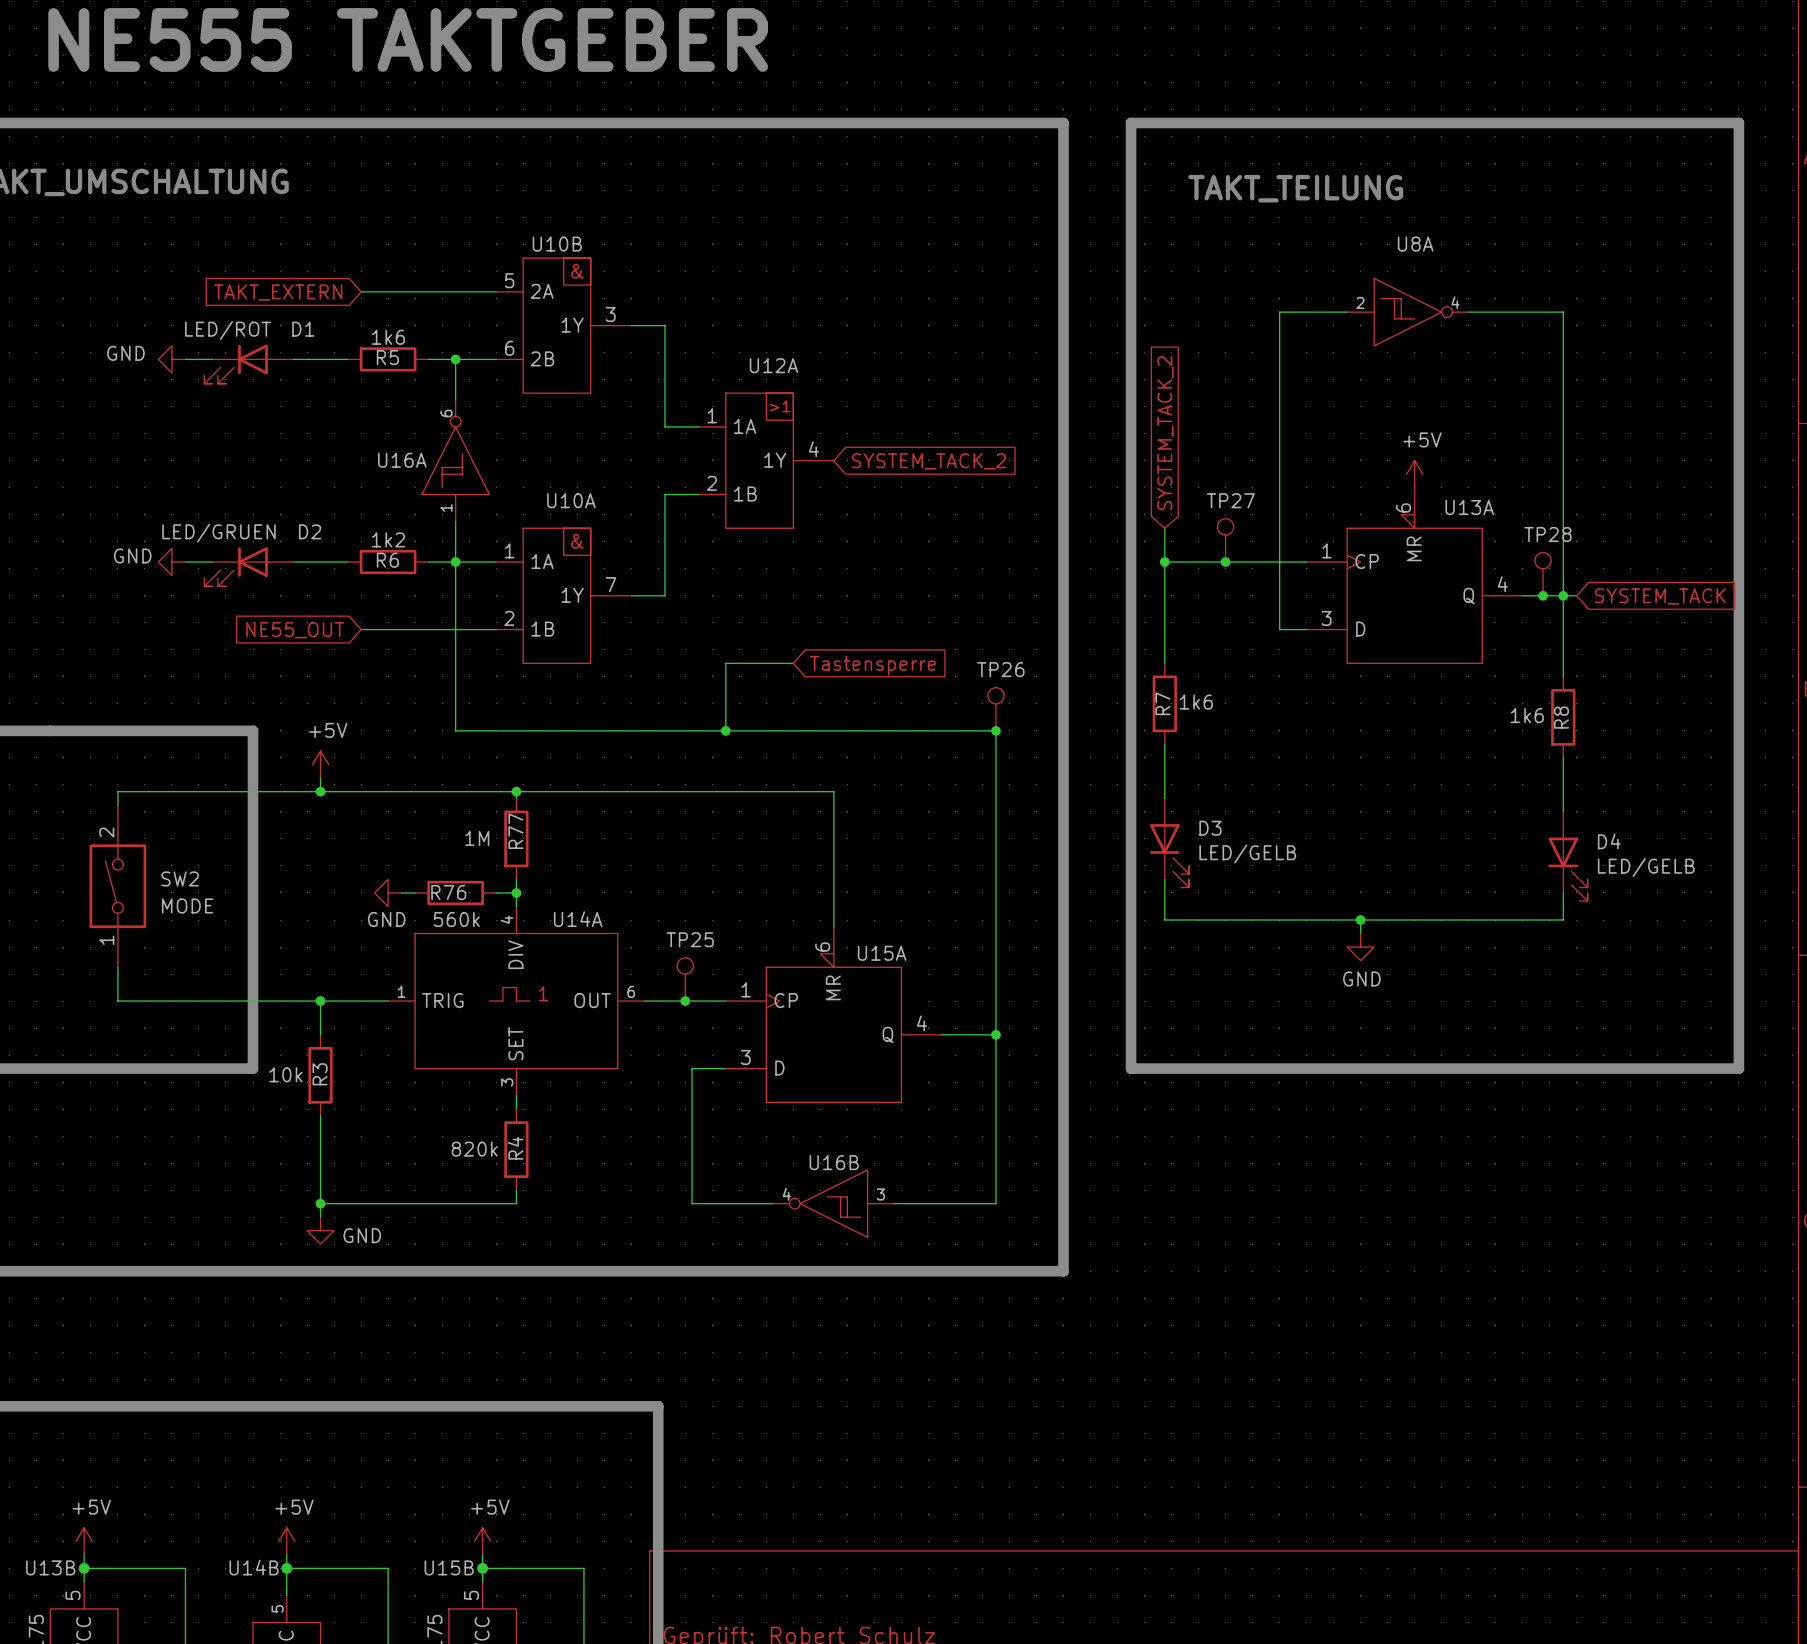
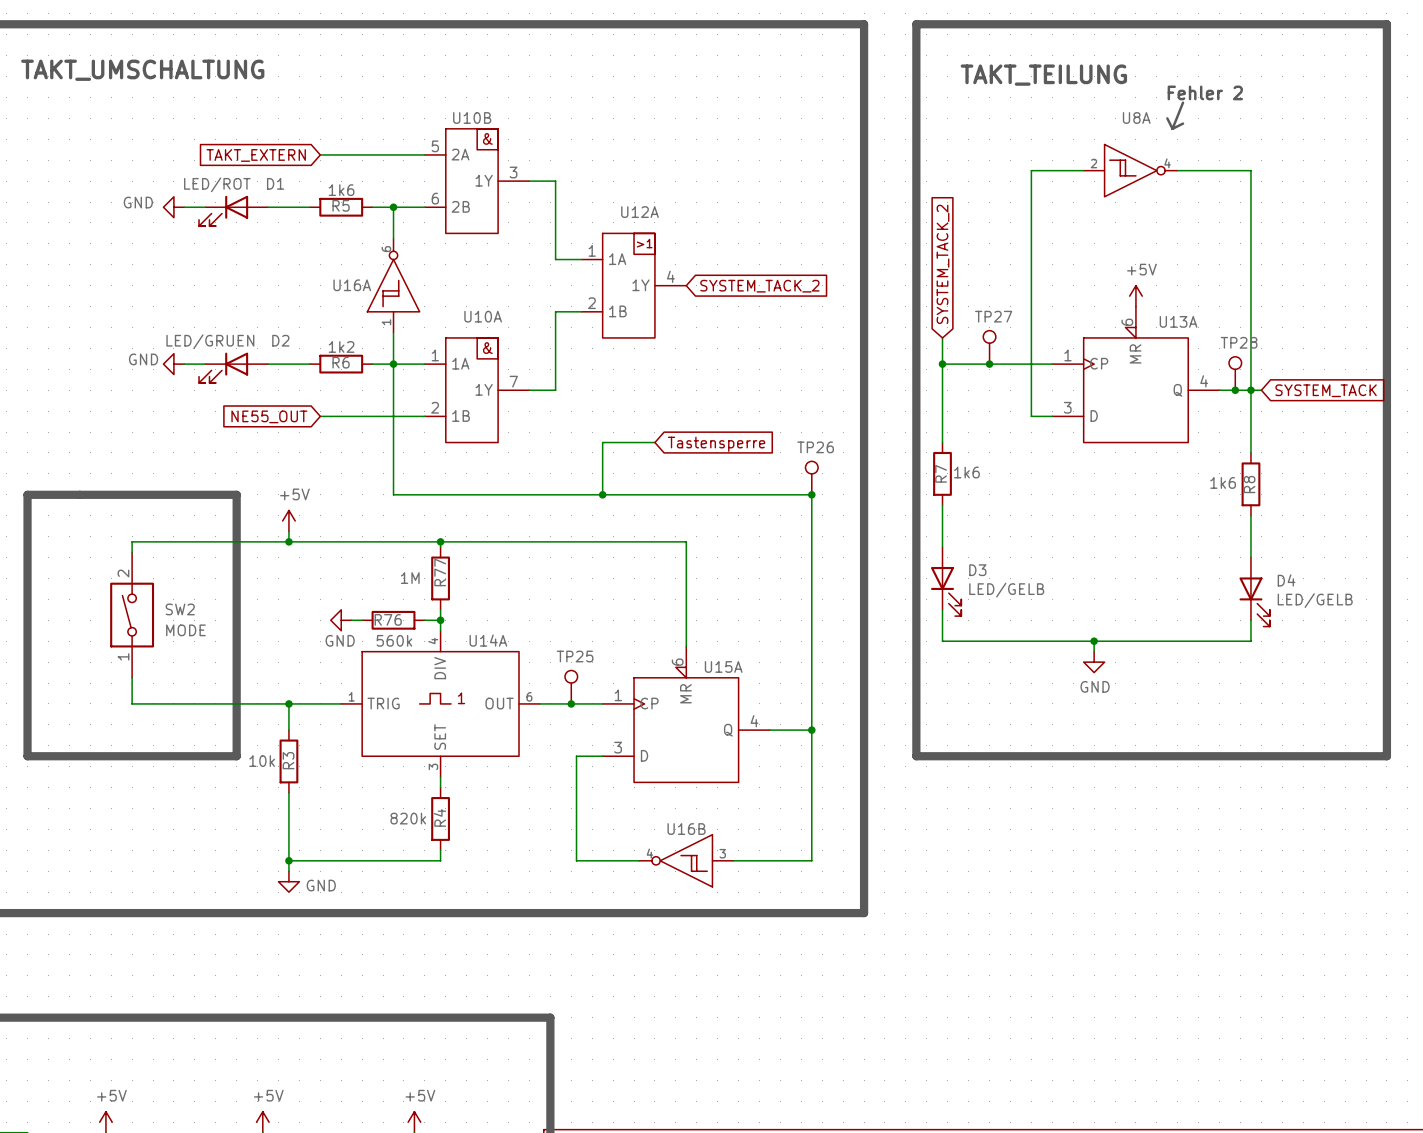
text: none -> Fehler 2 (1205, 92)
line: none -> (1183, 102) (1172, 128)
line: none -> (1167, 118) (1172, 128)
line: none -> (1183, 123) (1172, 128)

